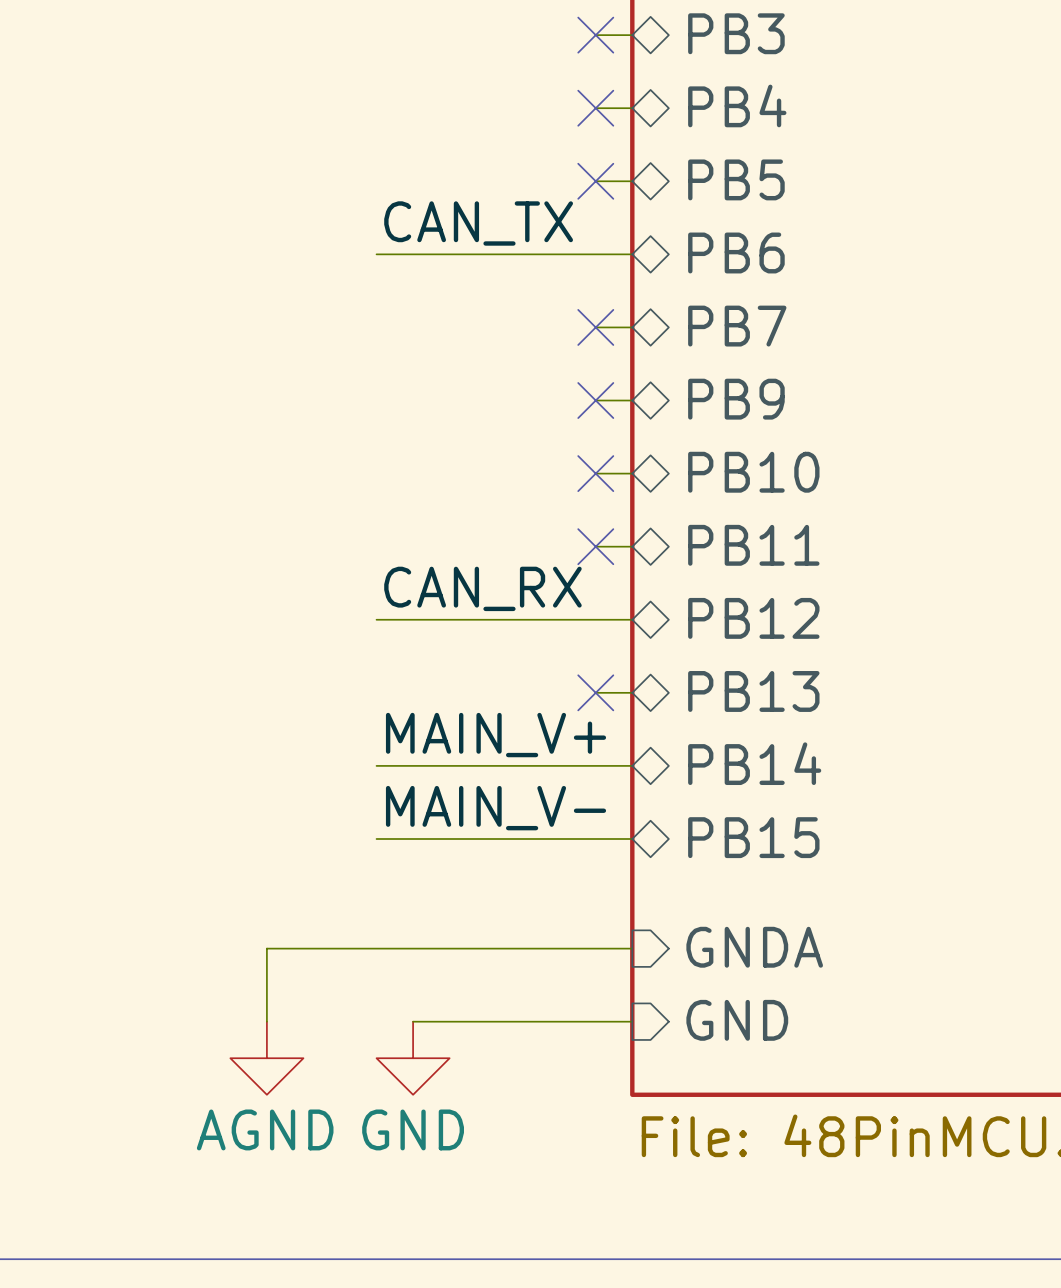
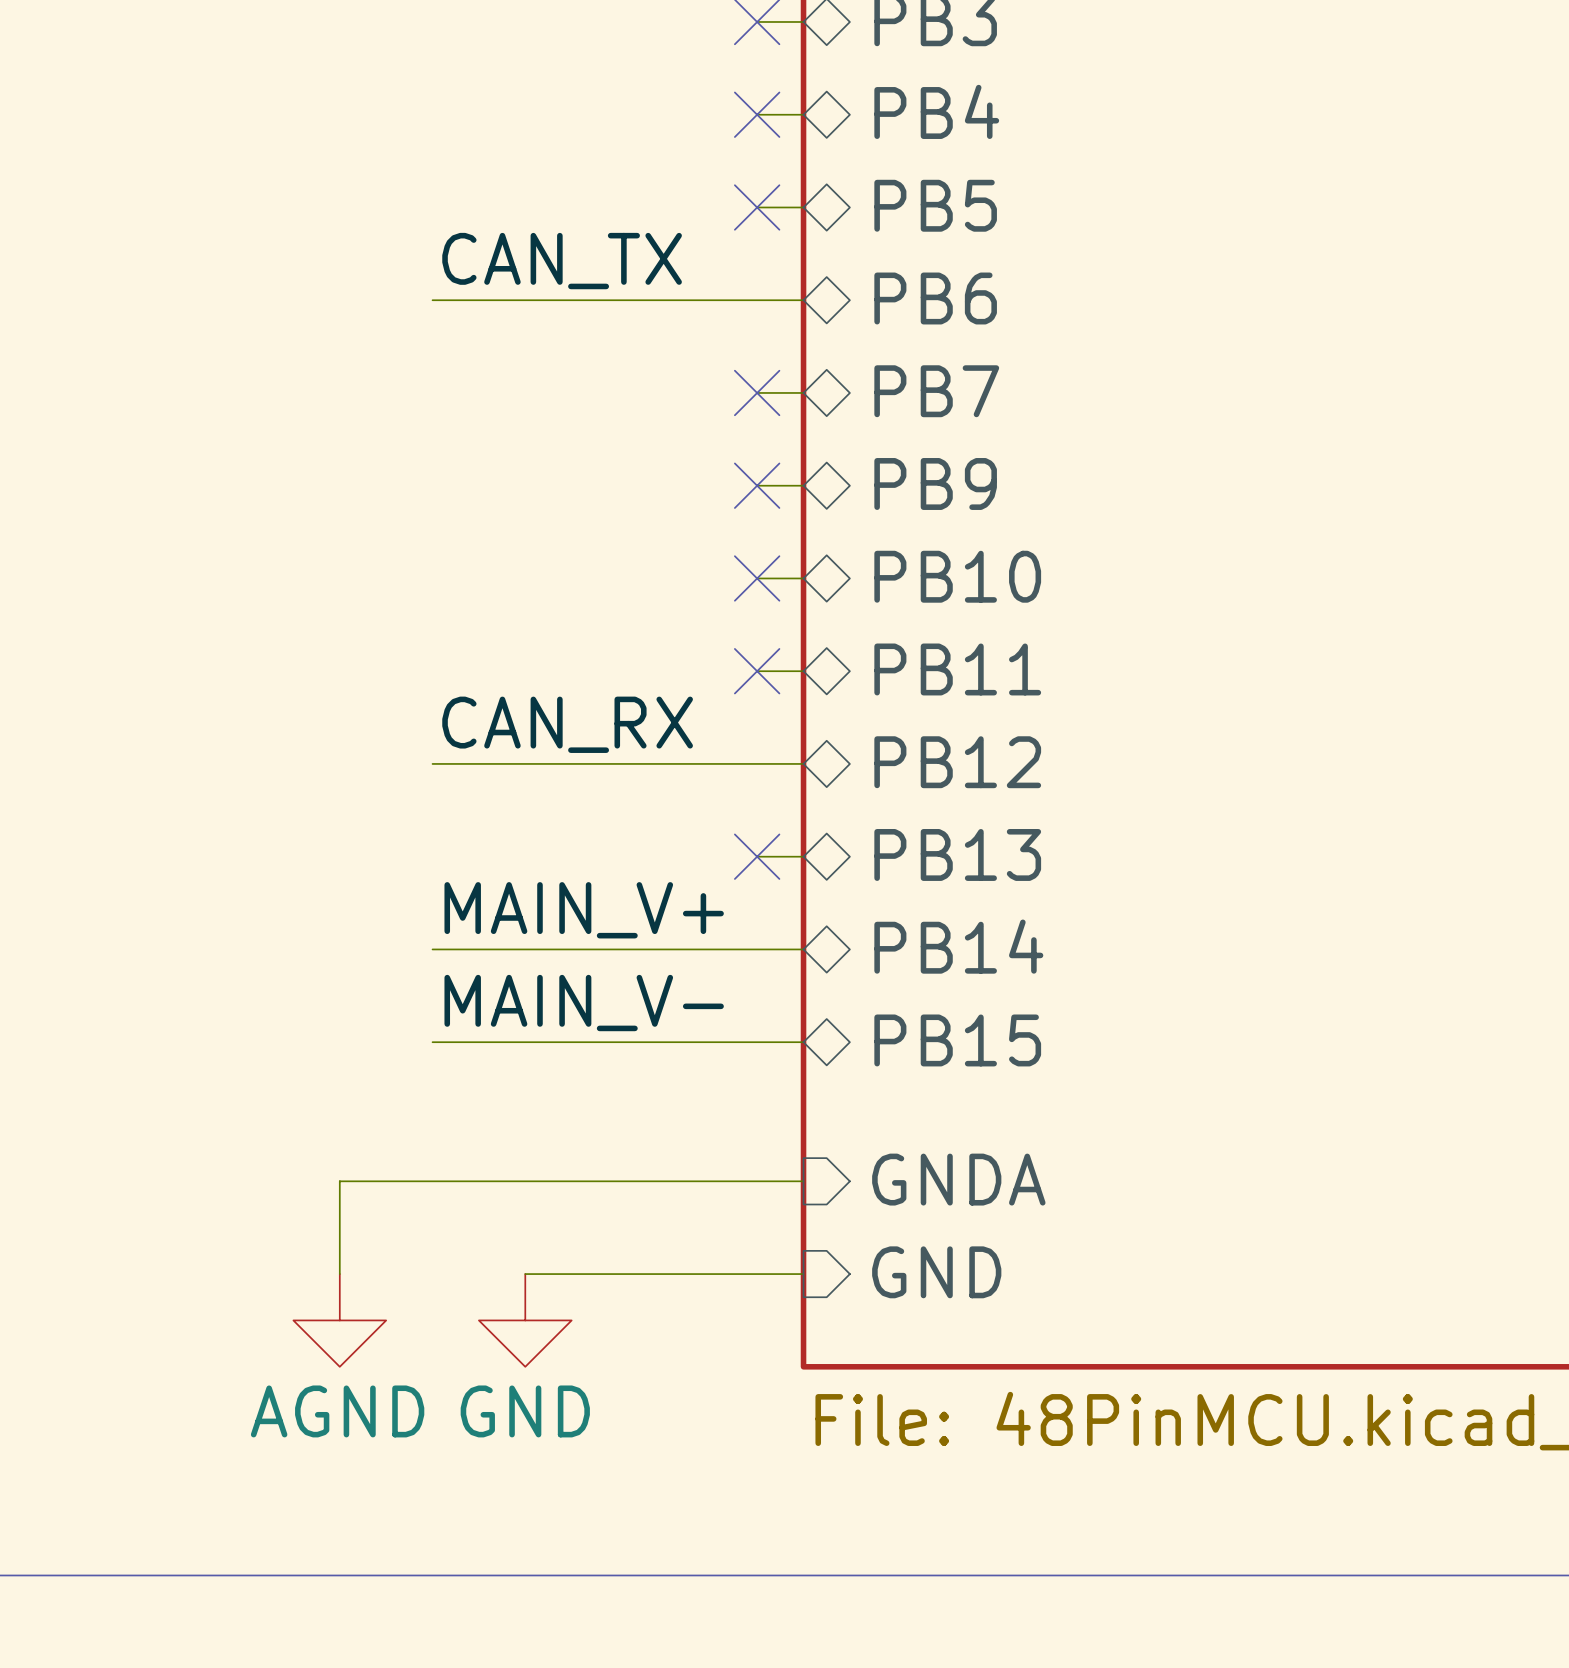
label position: CAN_TX (478, 223) -> CAN_TX (562, 261)
wire: none -> (432, 300) (478, 300)
label position: CAN_RX (482, 588) -> CAN_RX (567, 724)
wire: none -> (432, 763) (478, 763)
label position: MAIN_V+ (496, 735) -> MAIN_V+ (584, 910)
wire: none -> (432, 949) (478, 949)
label position: MAIN_V- (496, 808) -> MAIN_V- (584, 1003)
wire: none -> (432, 1042) (478, 1042)

